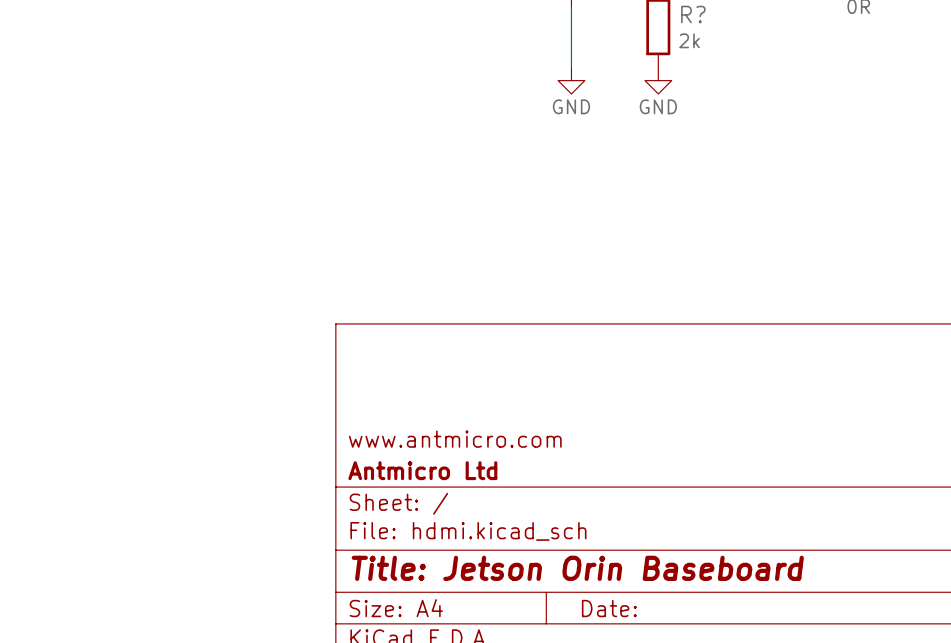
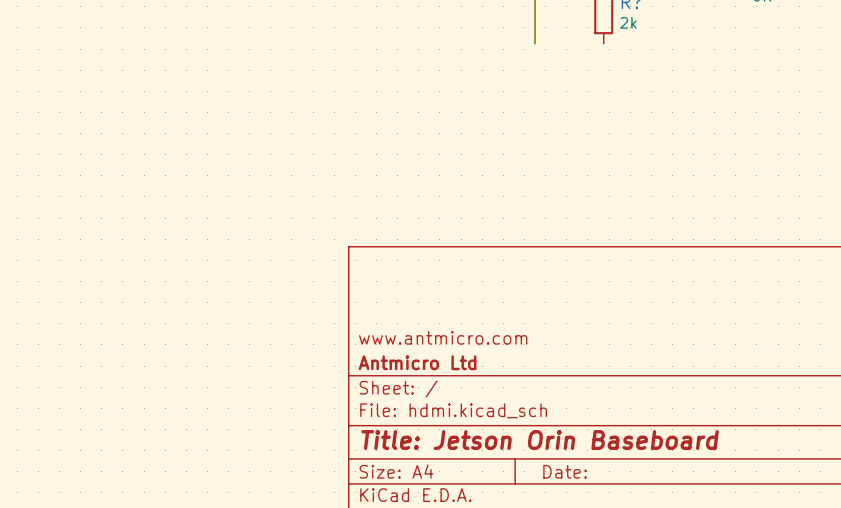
power symbol: GND (571, 80) -> none
power symbol: GND (658, 80) -> none

